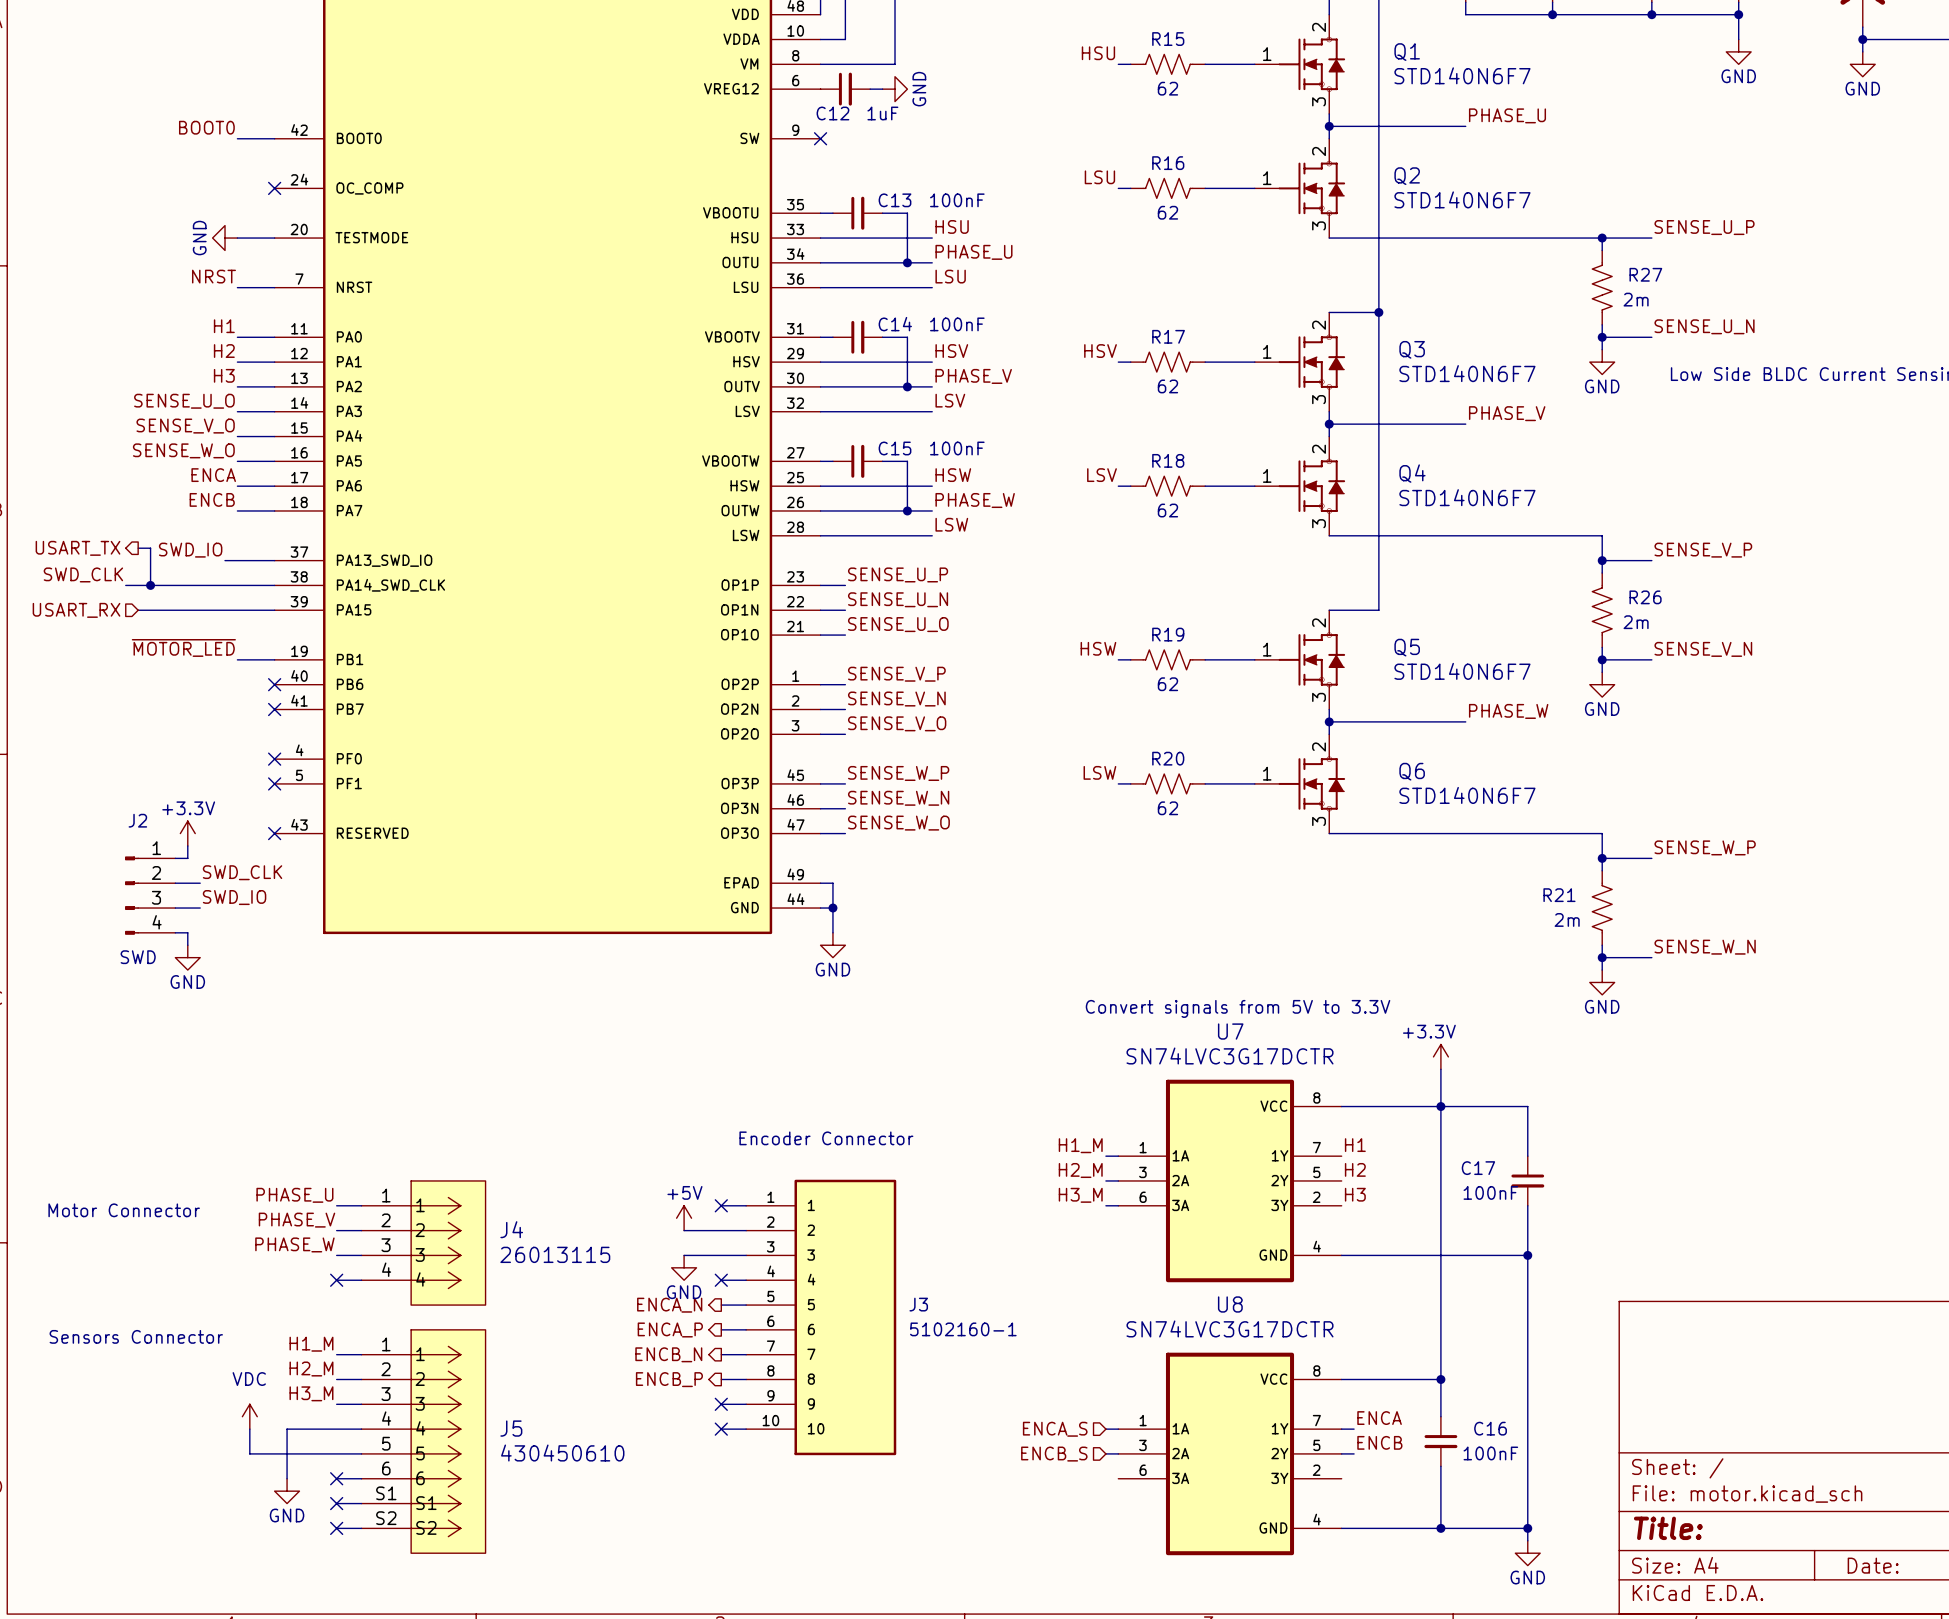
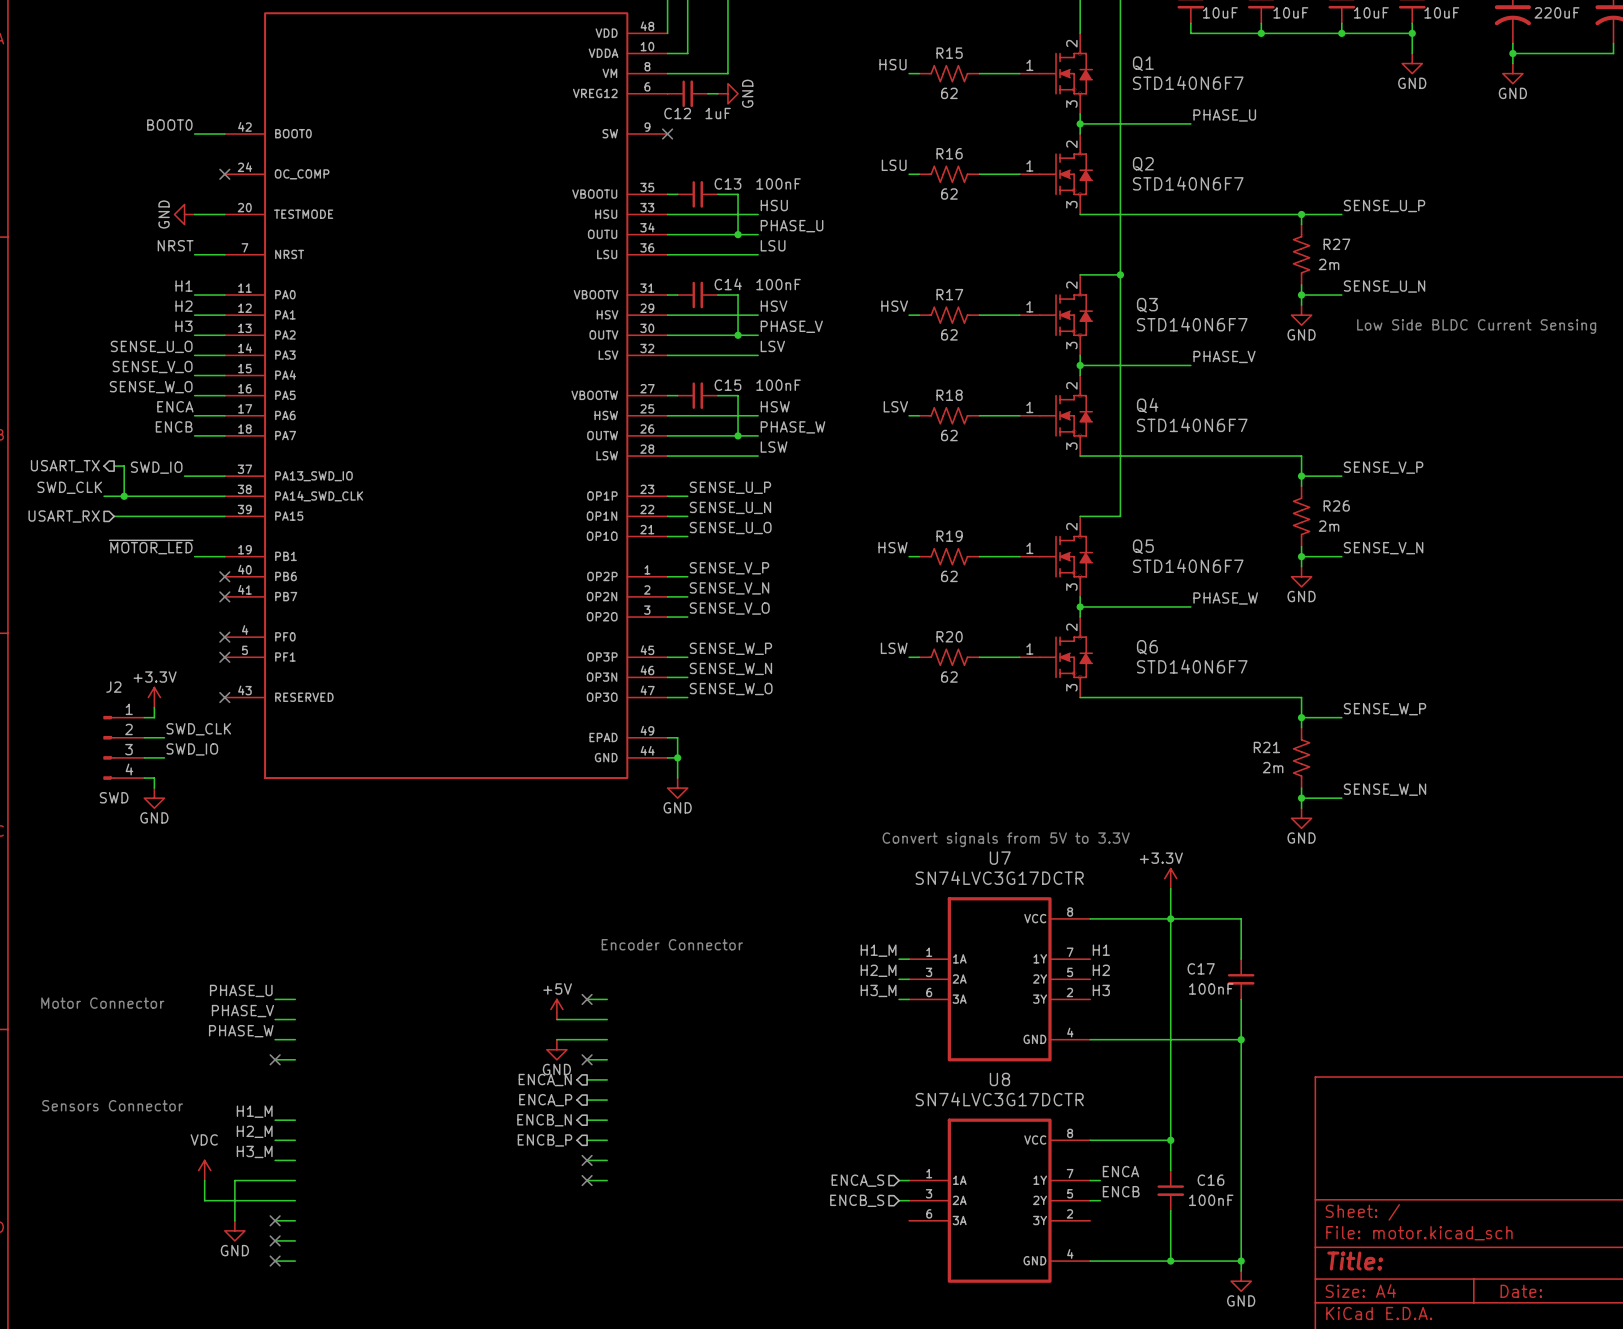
J4: 26013115 (423, 1243) -> none
J3: 5102160-1 (821, 1317) -> none
J5: 430450610 (423, 1441) -> none

